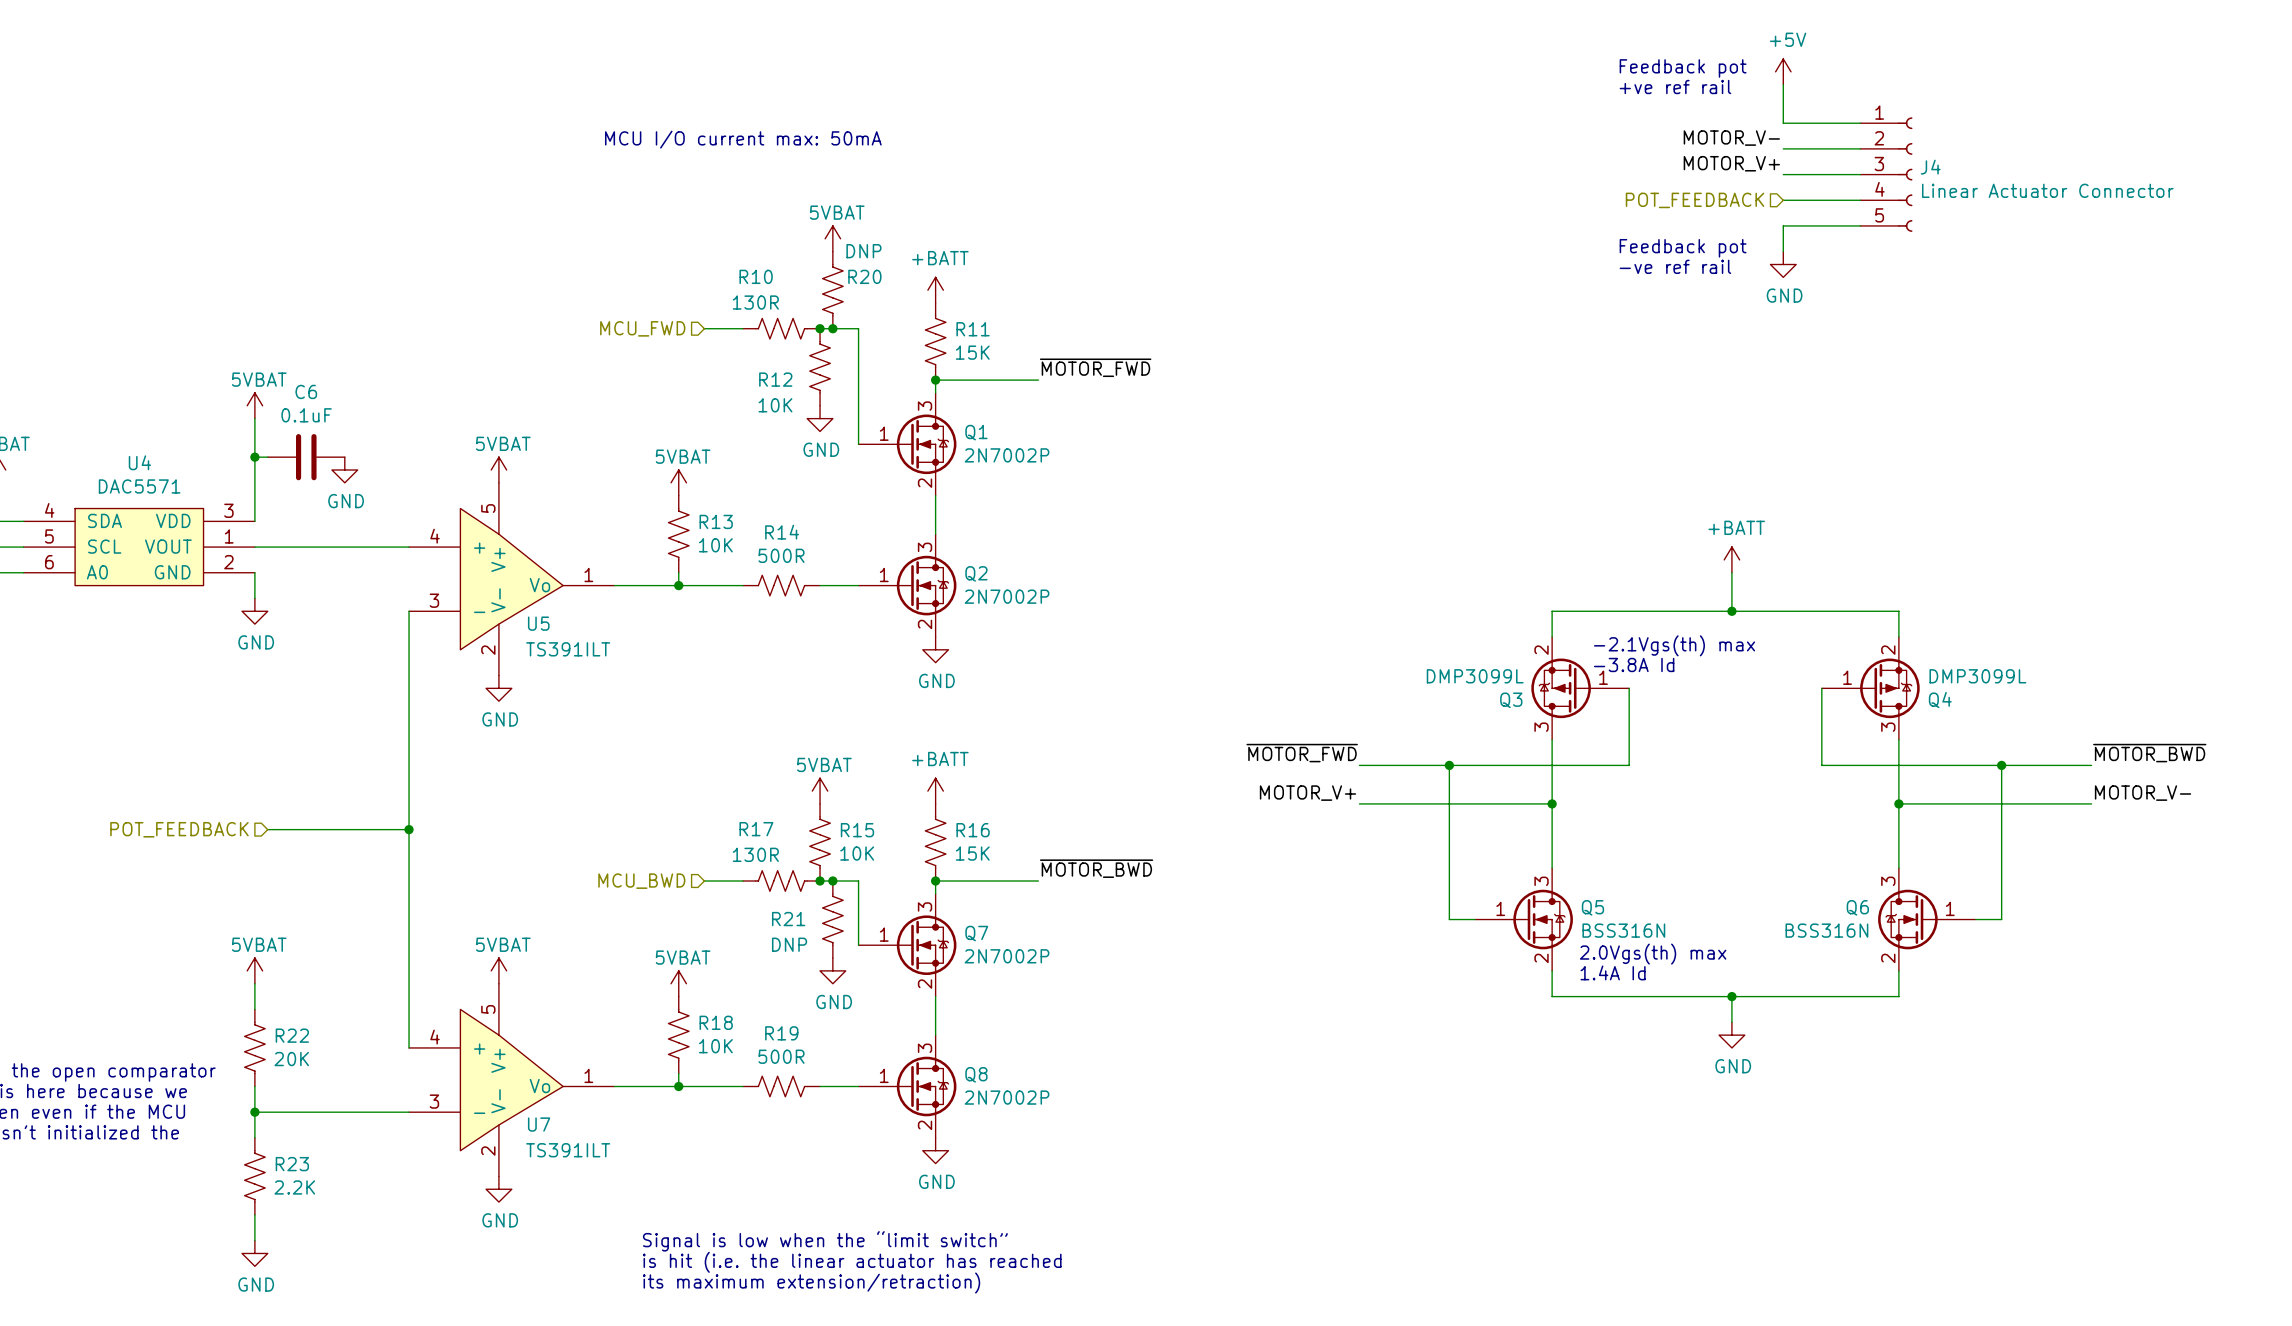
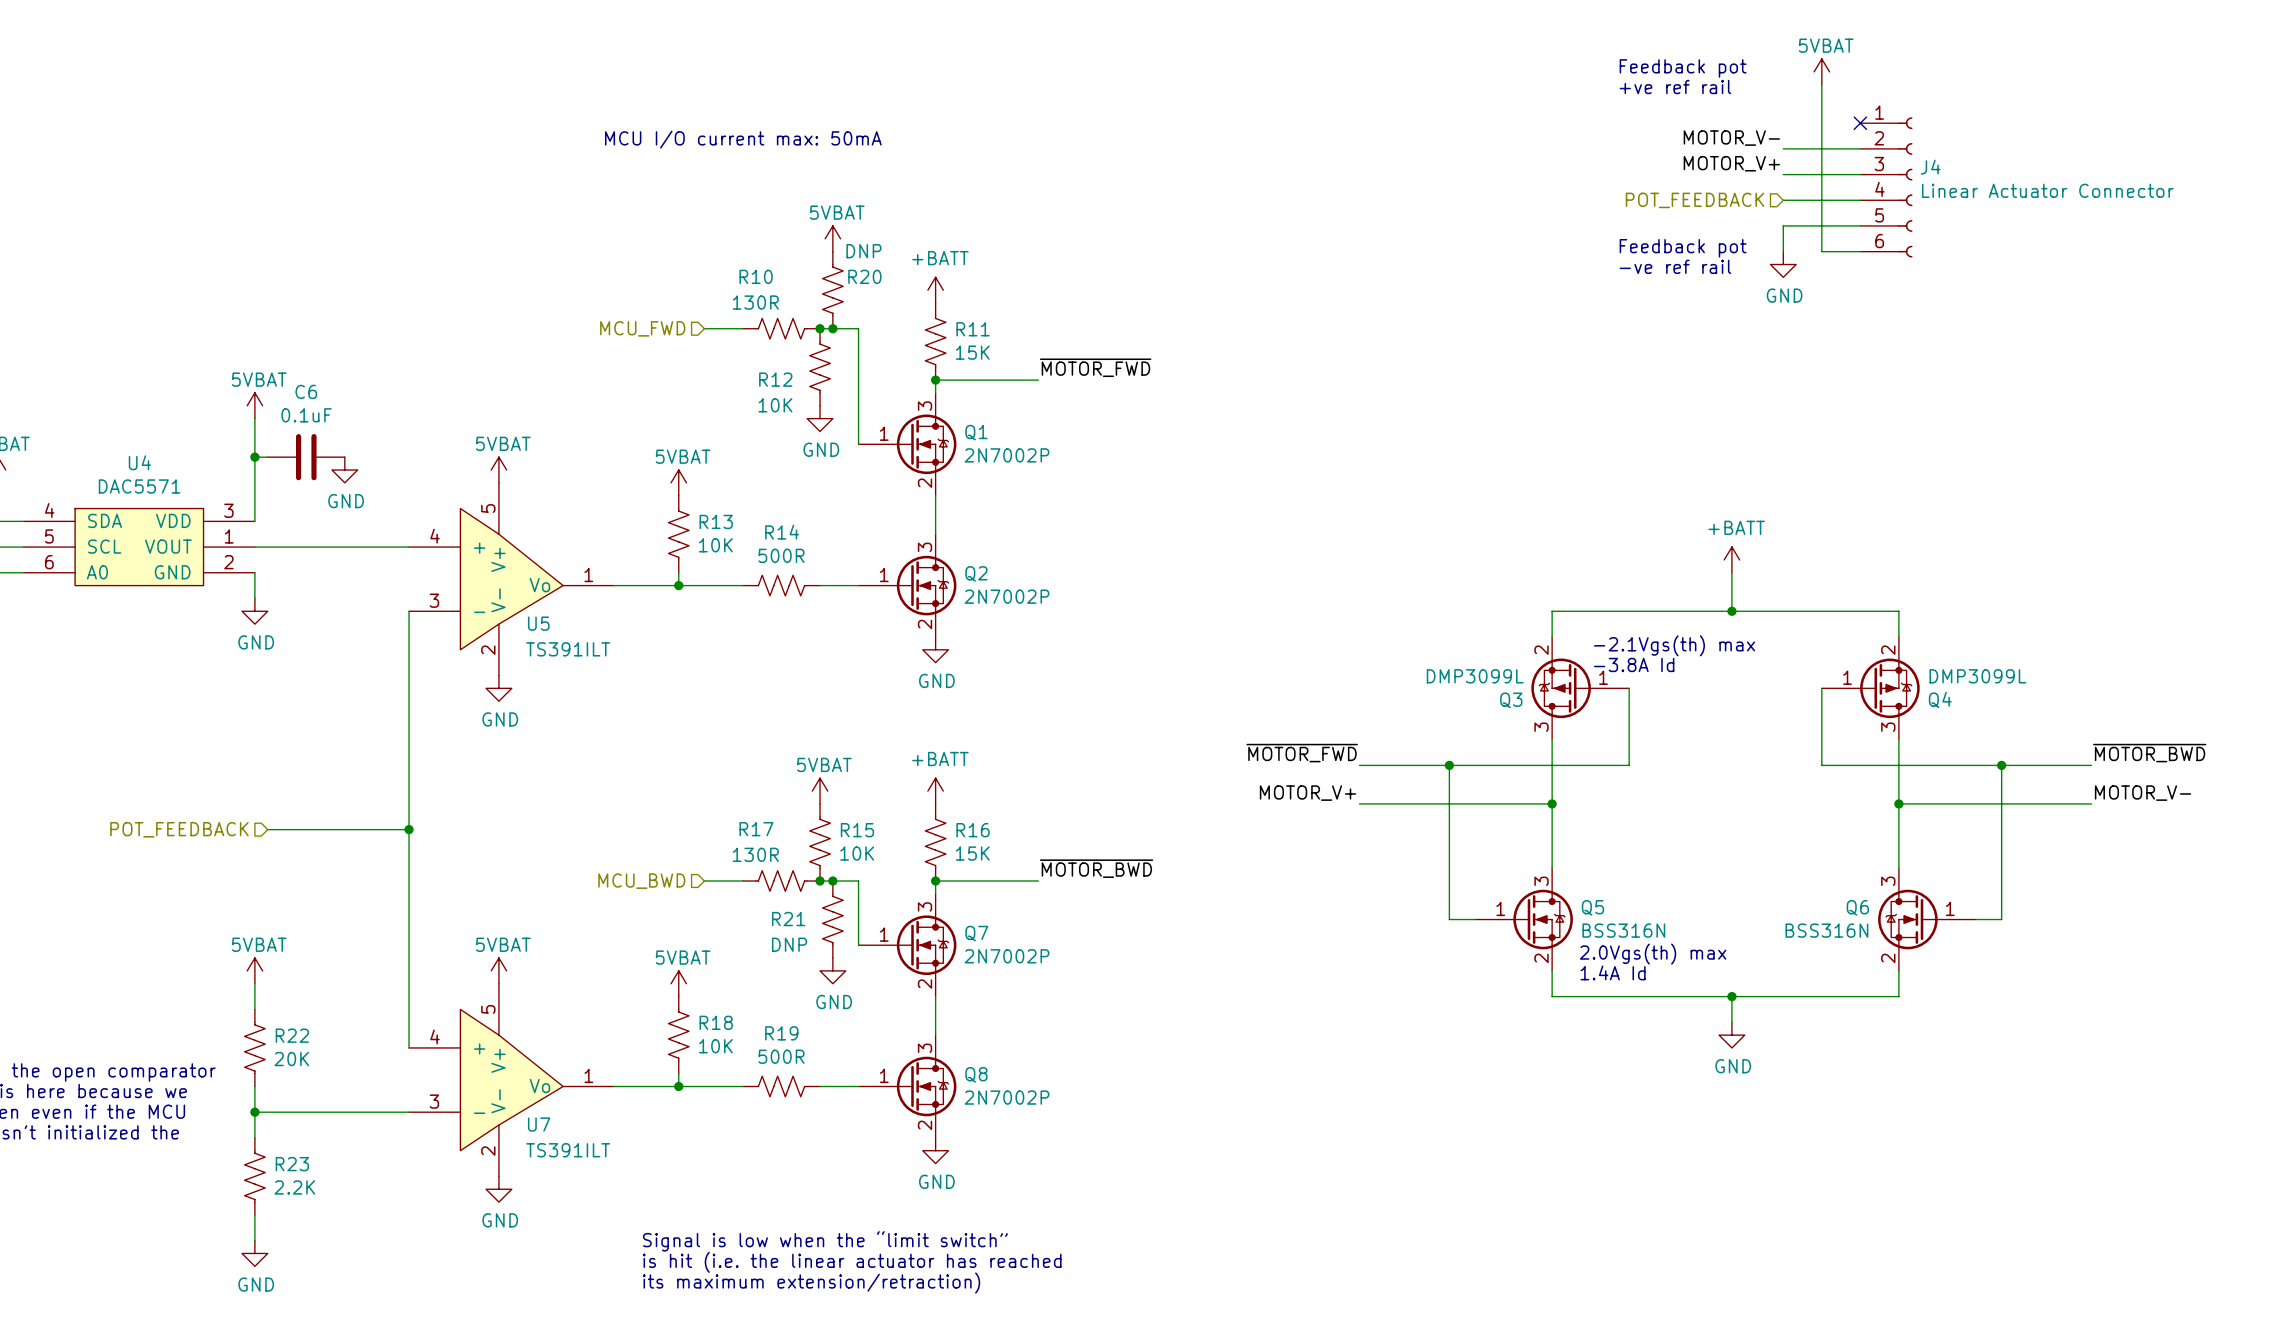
power symbol: +5V (1783, 71) -> none
power symbol: none -> 5VBAT (1821, 71)
wire: (1783, 84) (1783, 123) (1860, 123) -> none
wire: none -> (1821, 84) (1821, 251) (1860, 251)
J4 symbol: [1860, 117, 1913, 232] -> [1860, 117, 1913, 258]
no-connect mark: none -> (1860, 123)

